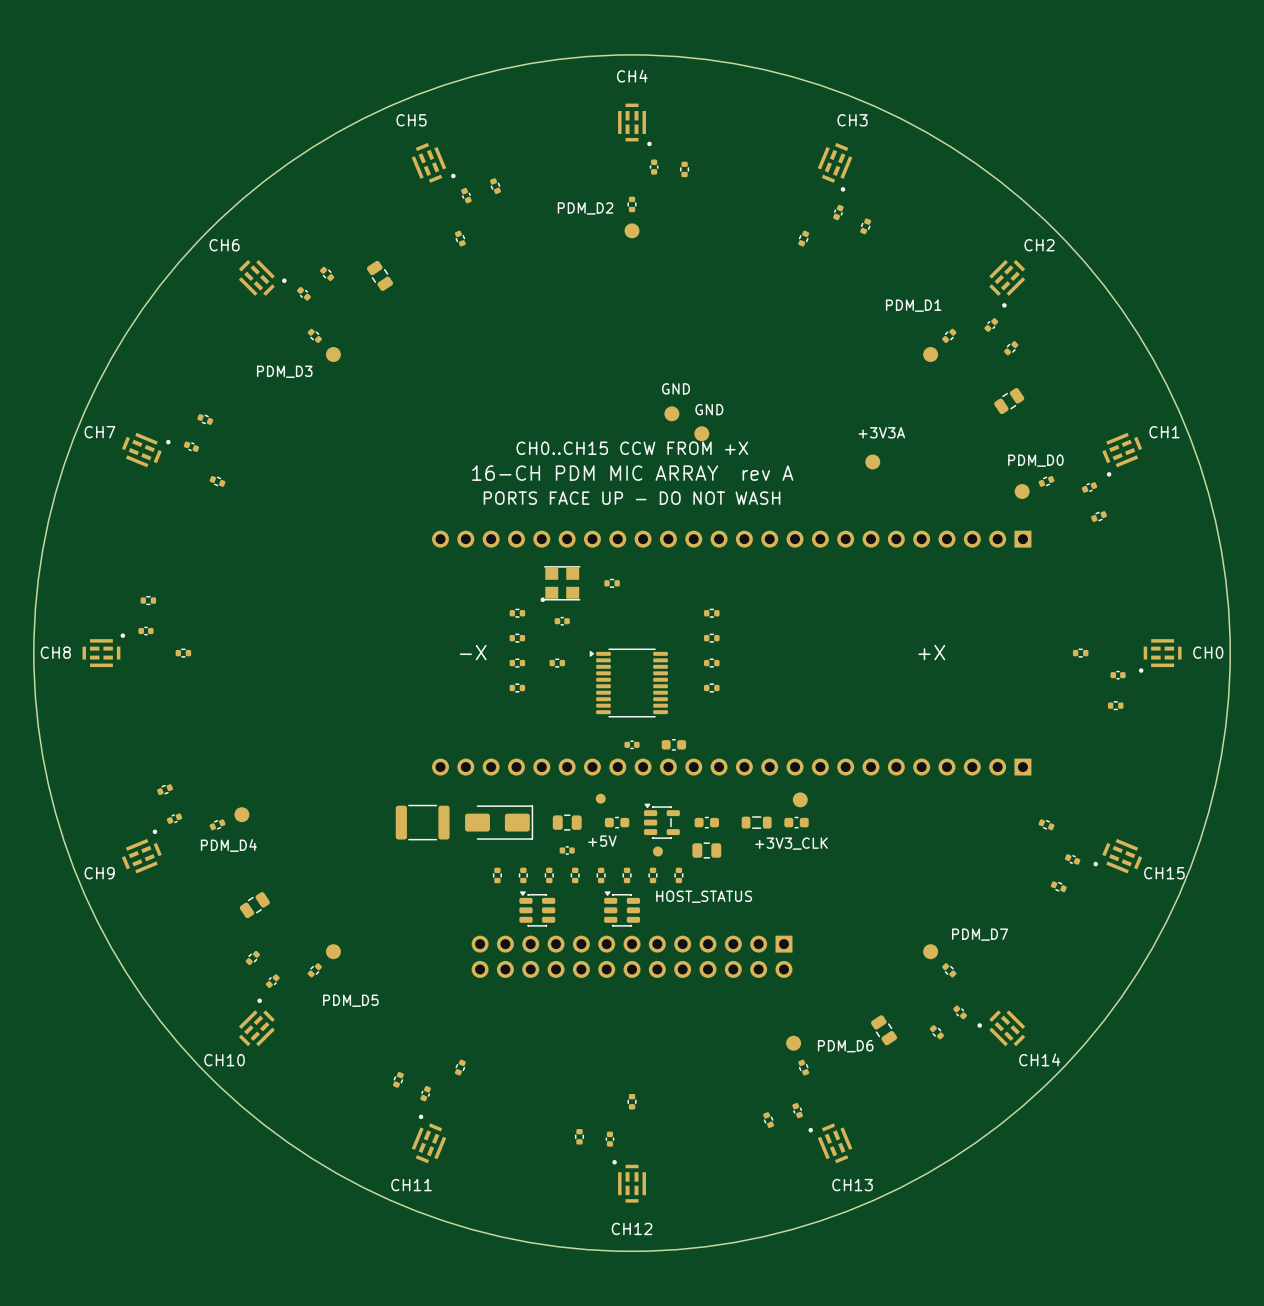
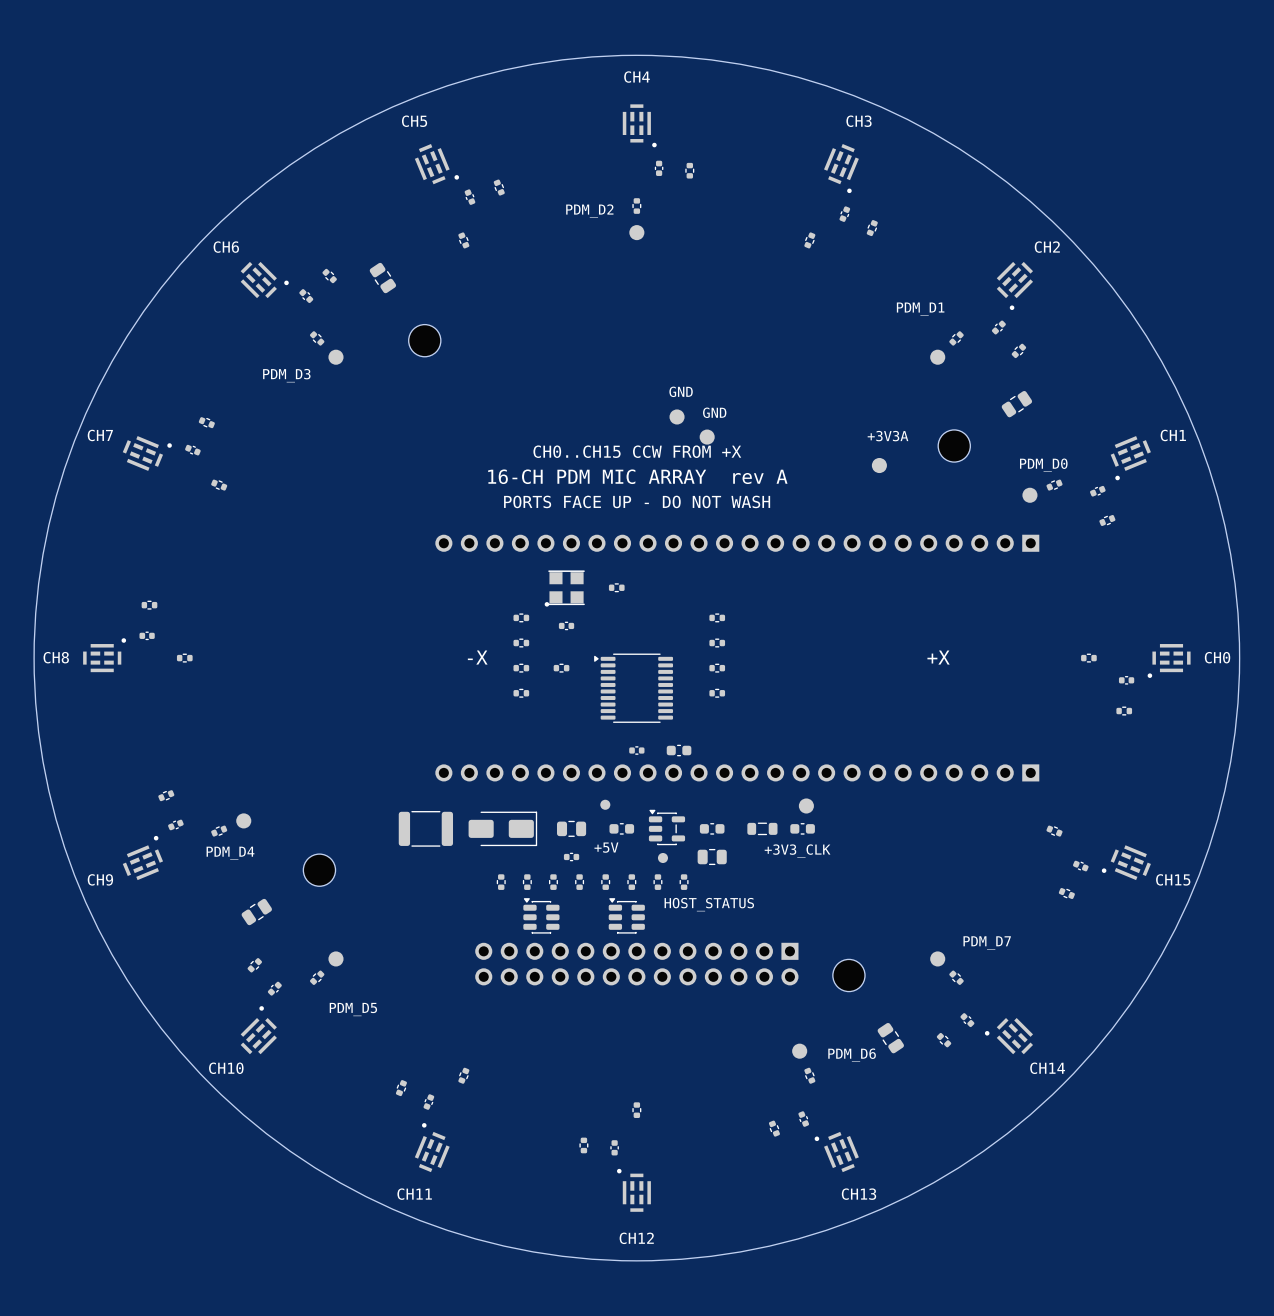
part: none -> (424, 340)
part: none -> (954, 446)
part: none -> (319, 870)
part: none -> (848, 975)

